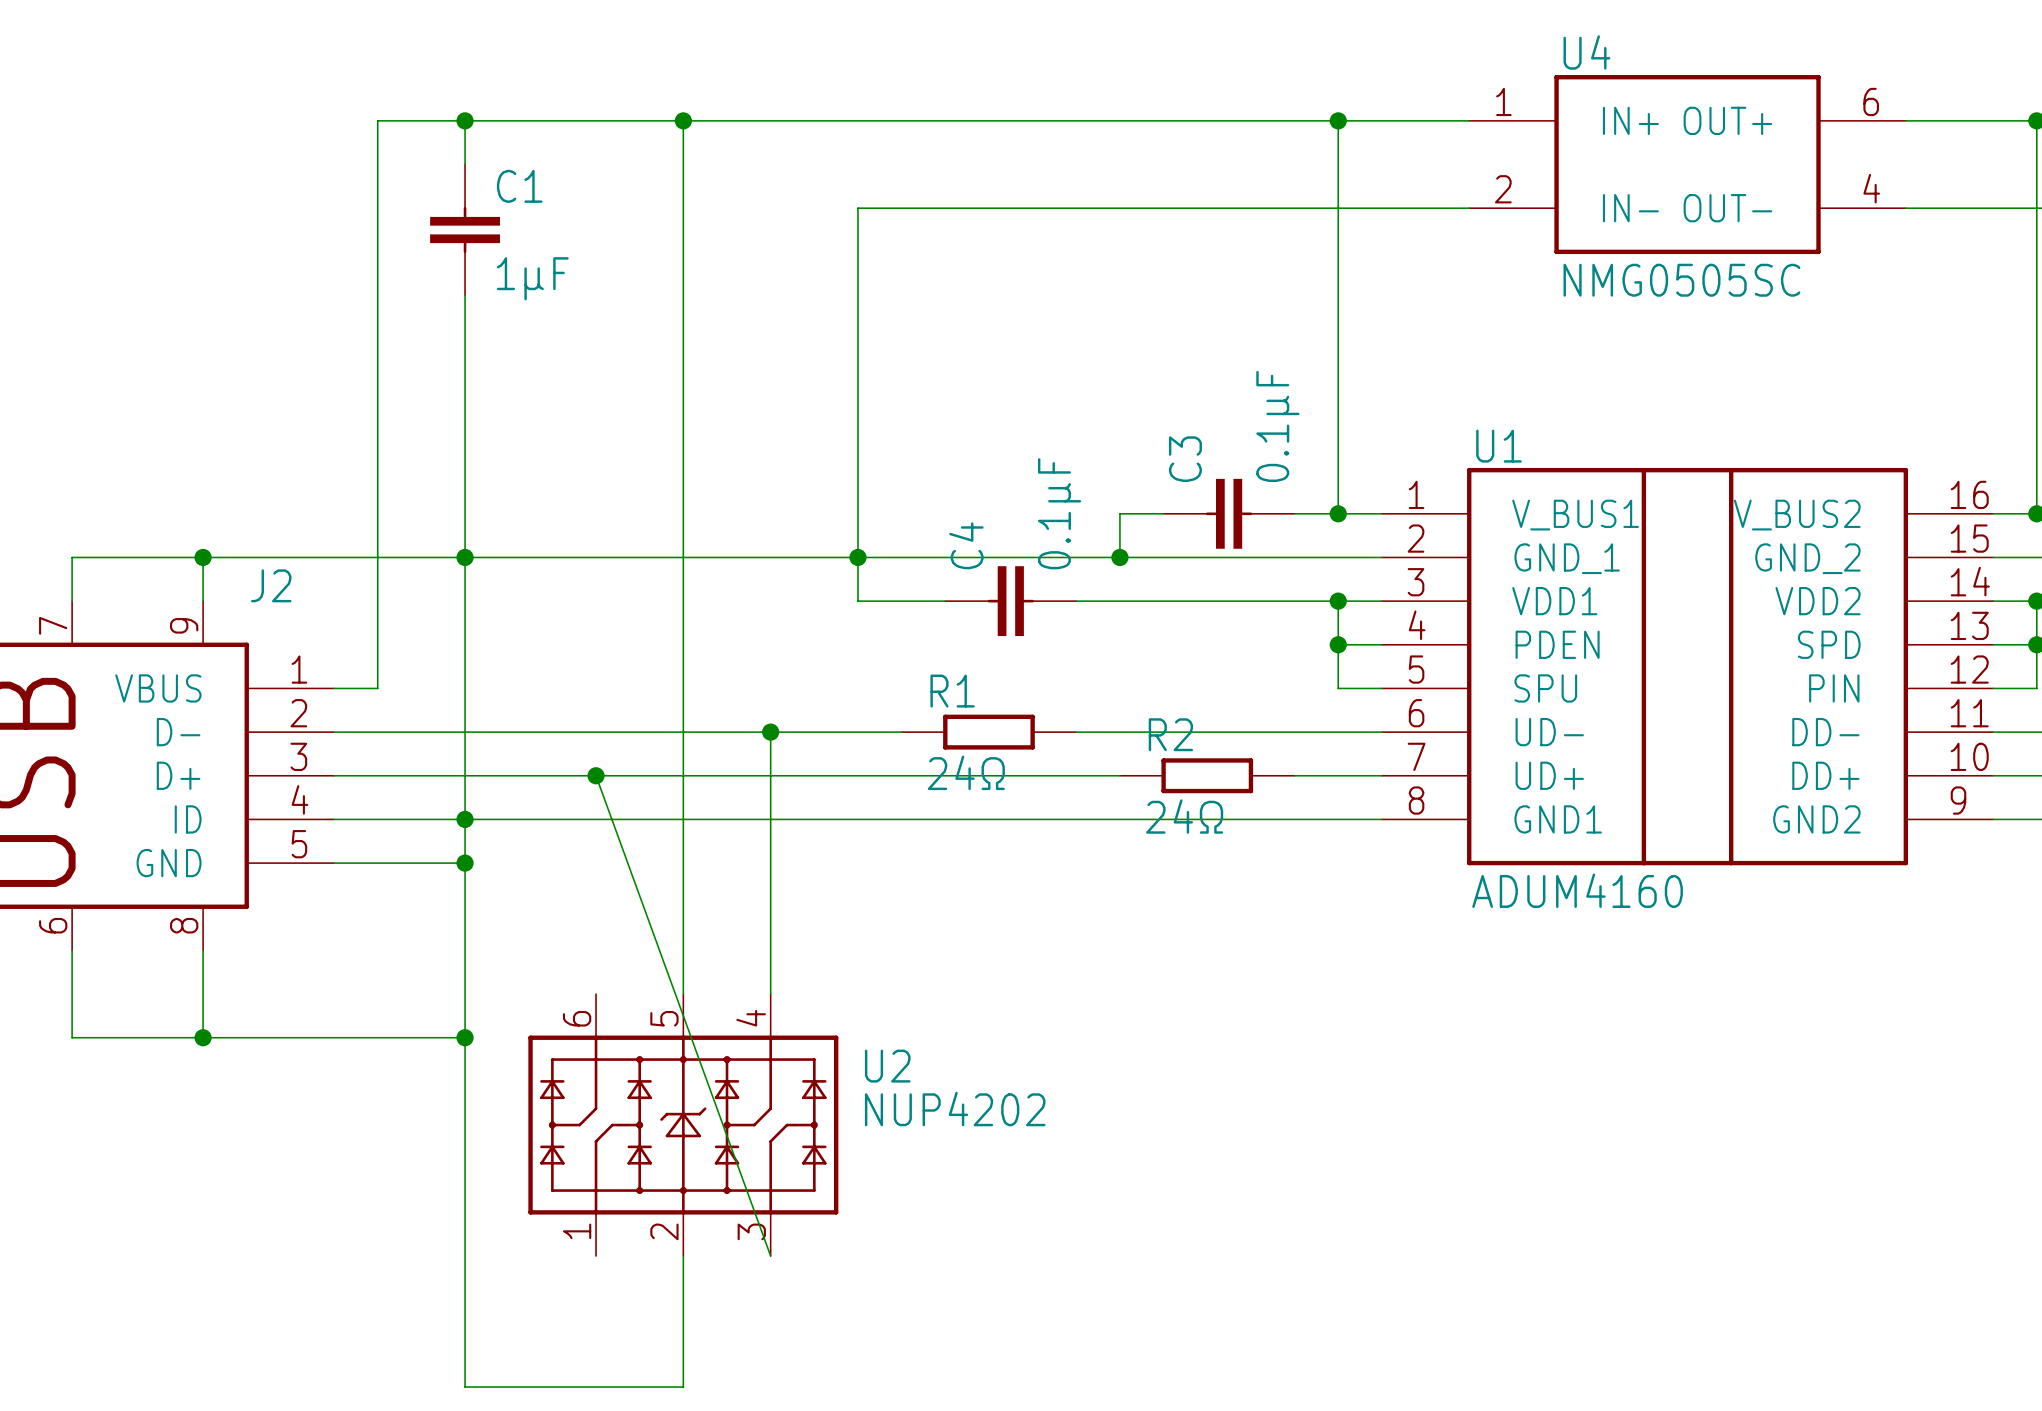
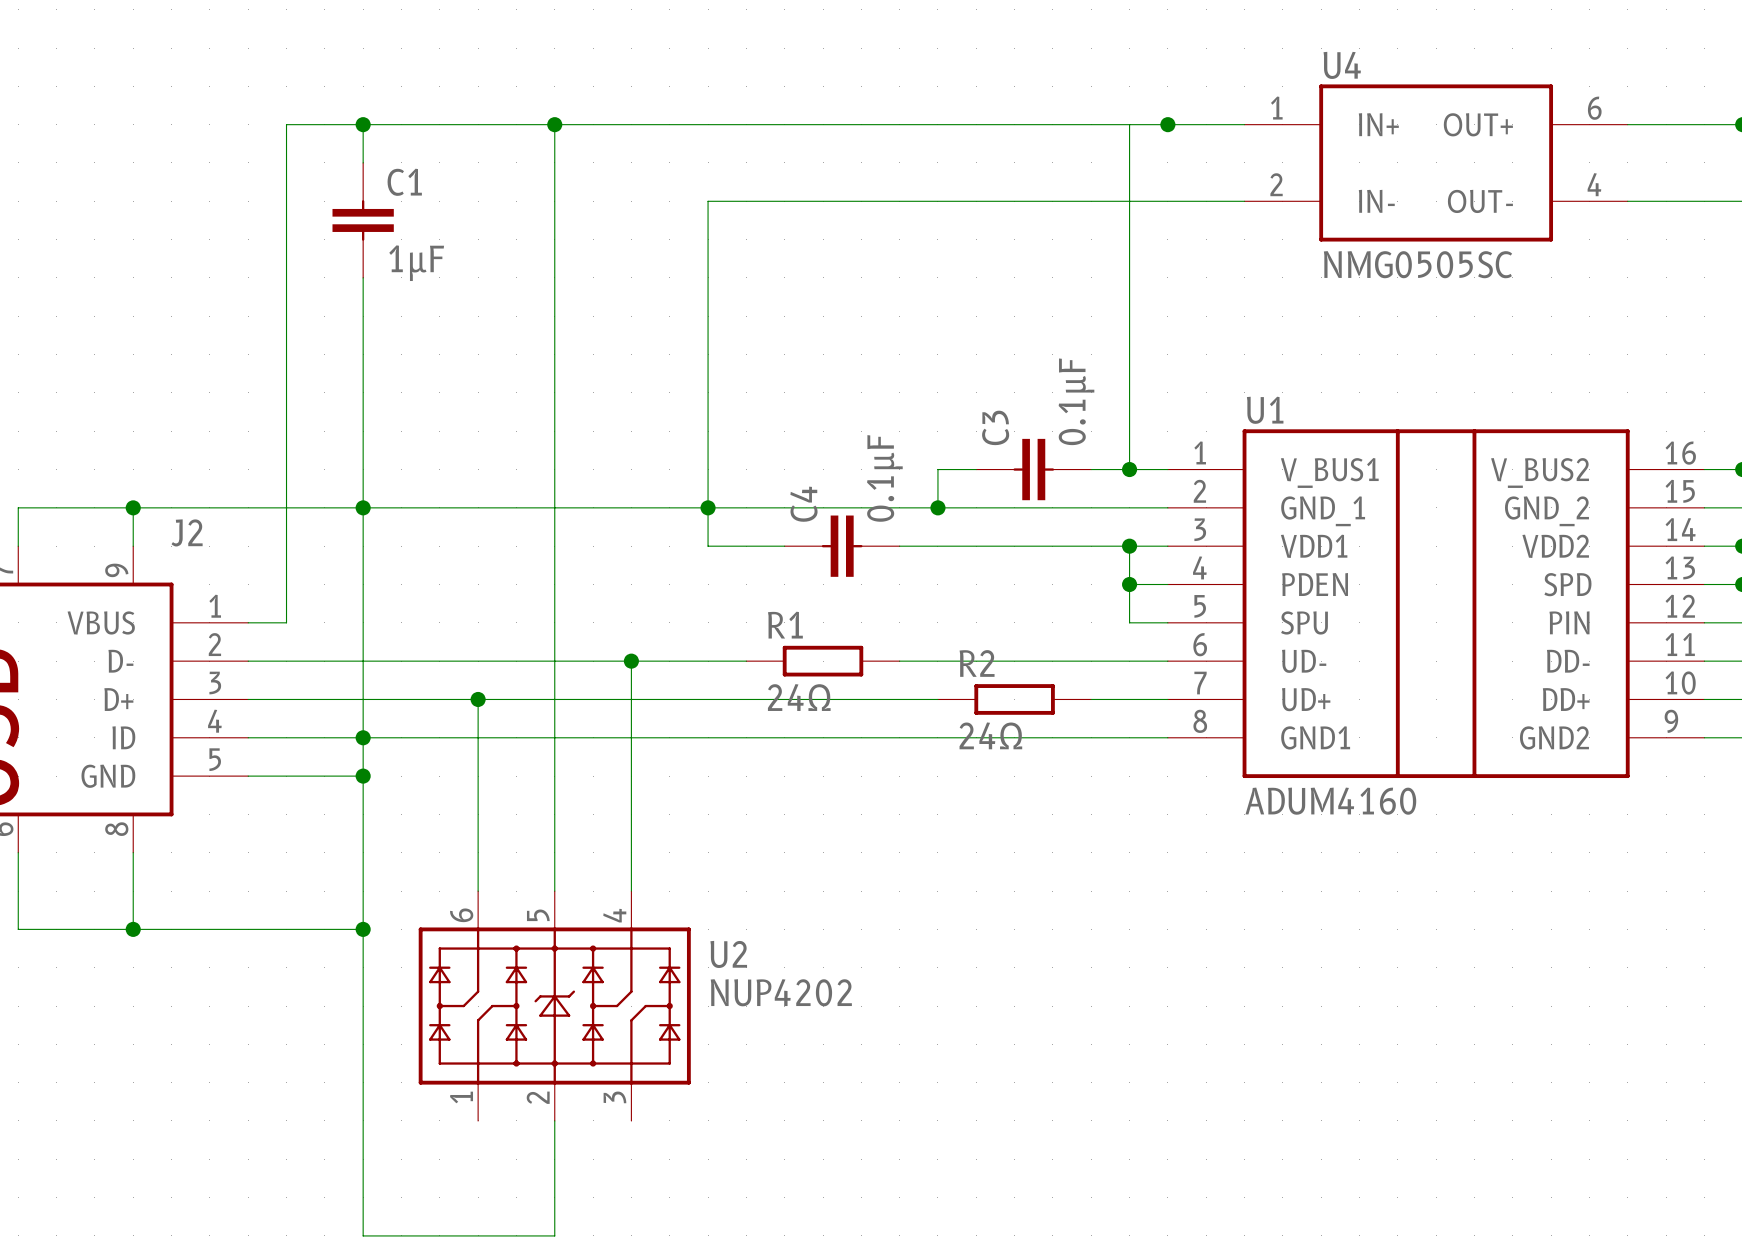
junction position: (1338, 120) -> (1167, 124)
wire: (596, 775) (770, 1256) -> (478, 699) (478, 891)

